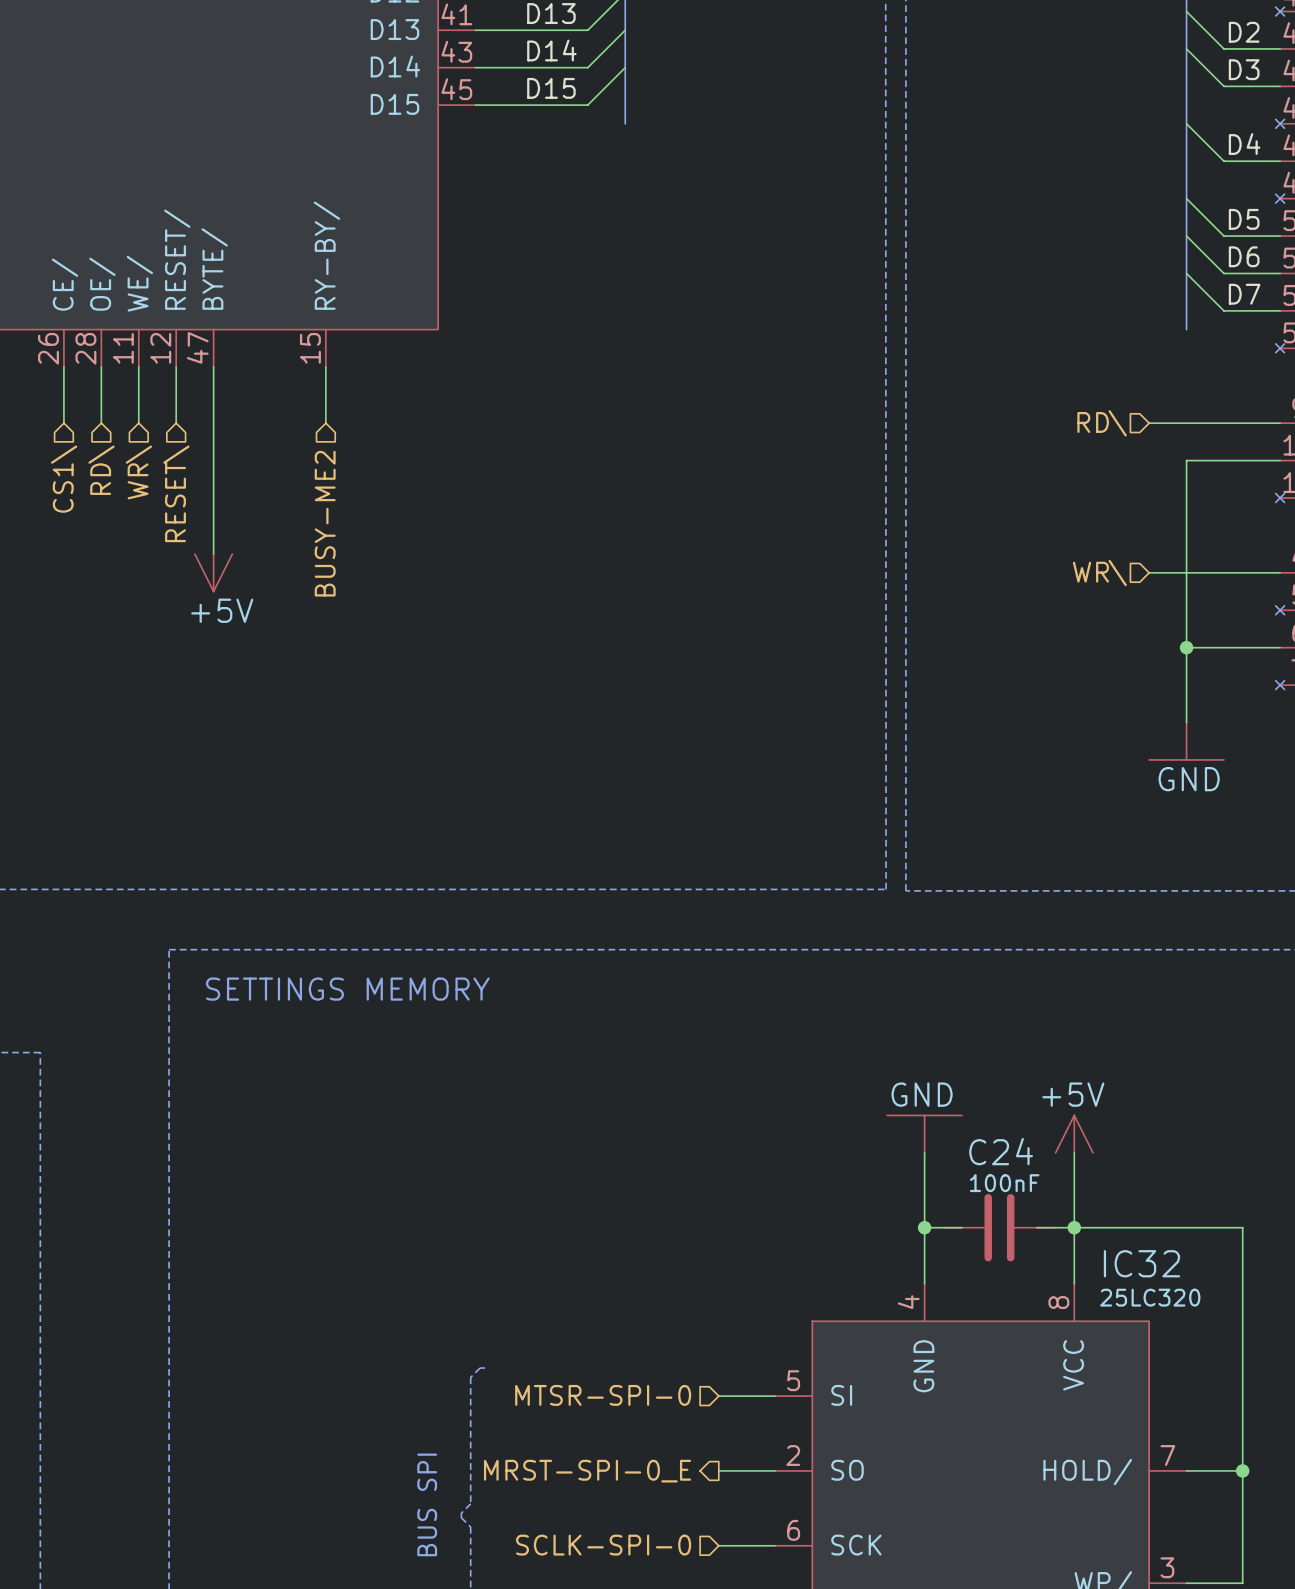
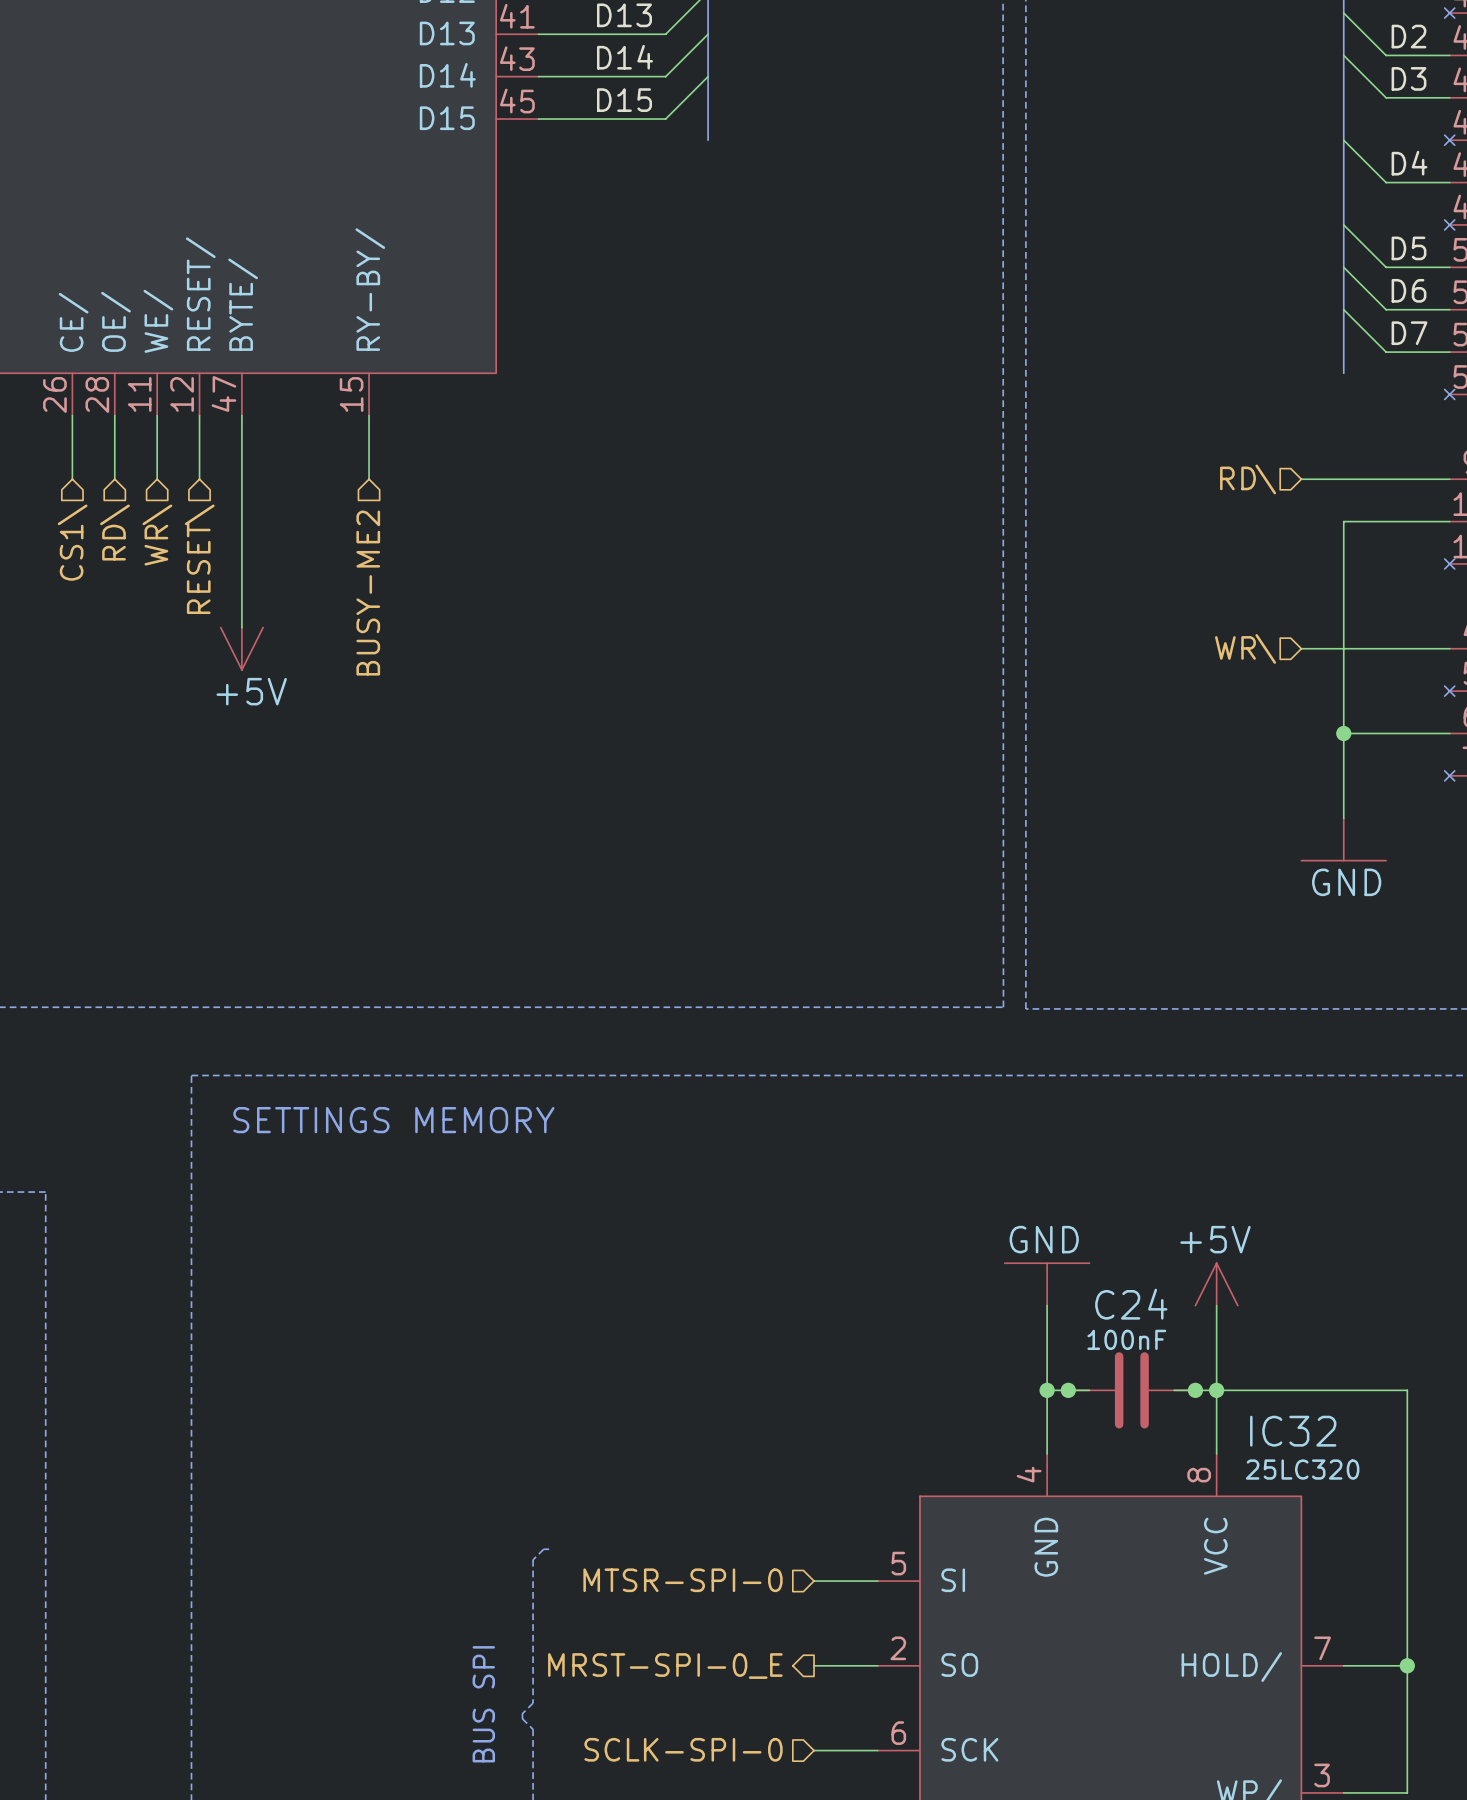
C24 name position: C24 (1001, 1151) -> C24 (1131, 1304)
C24 value position: 100nF (1004, 1183) -> 100nF (1126, 1339)
junction: none -> (1068, 1390)
junction: none -> (1195, 1390)

